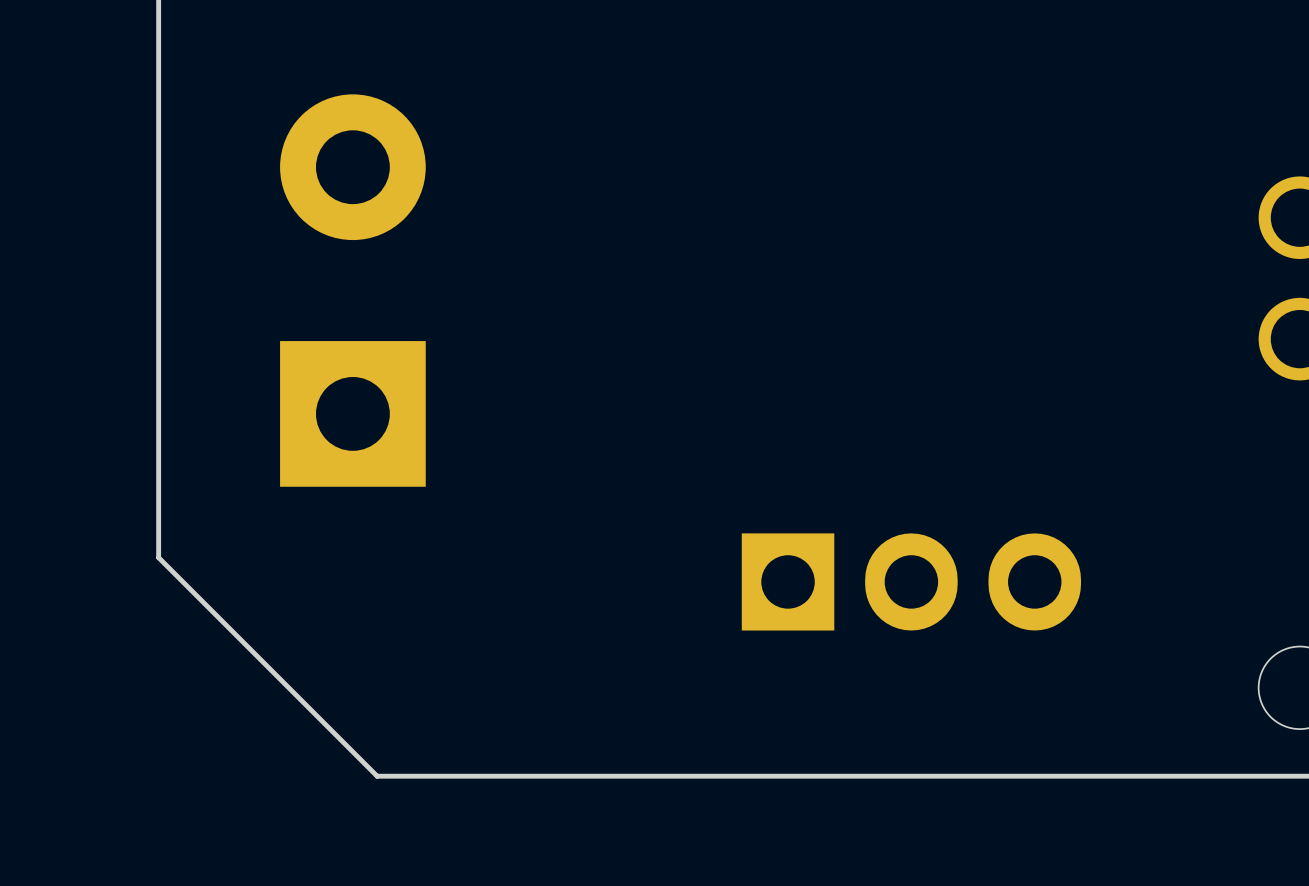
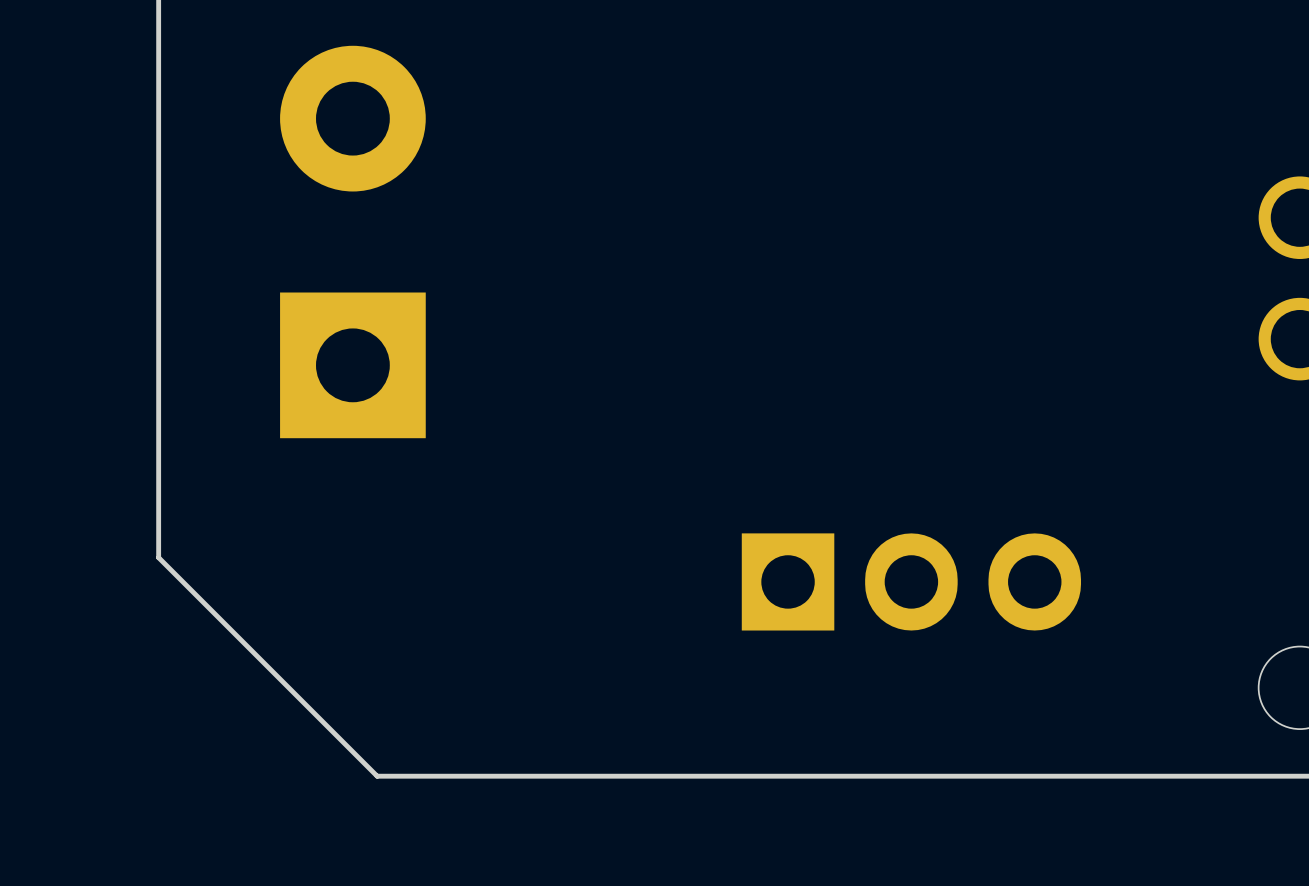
part position: (352, 290) -> (352, 242)

